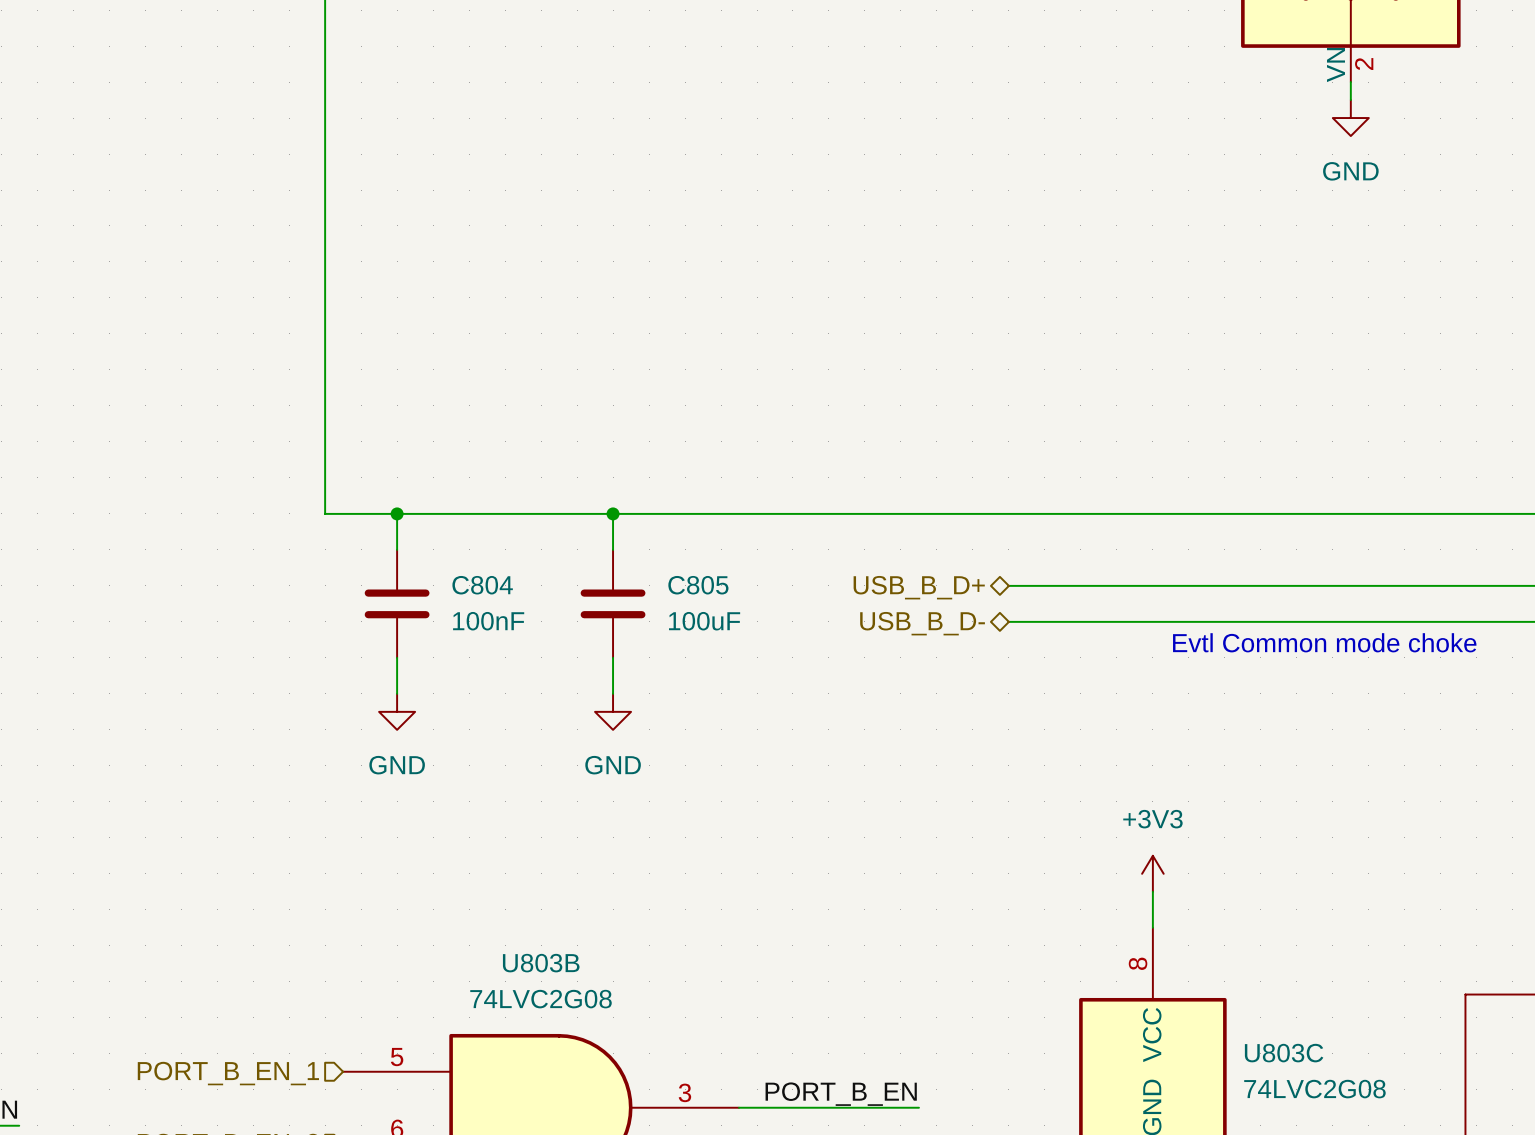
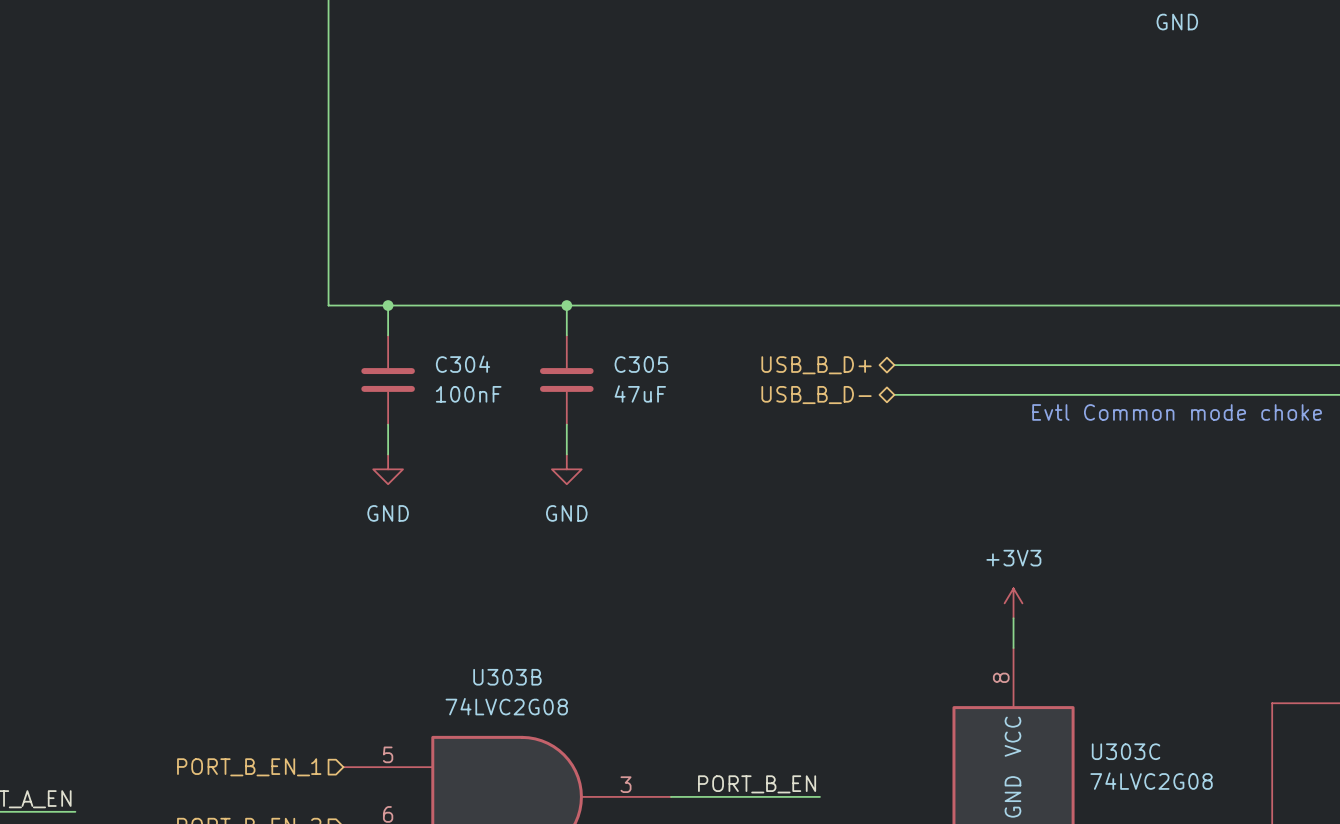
C804 name: C804 (482, 585) -> C304 (463, 364)
C805 name: C805 (698, 585) -> C305 (641, 364)
C805 value: 100uF (704, 621) -> 47uF (640, 393)
U803B name: U803B (541, 963) -> U303B (507, 677)
U803C name: U803C (1284, 1053) -> U303C (1126, 751)

